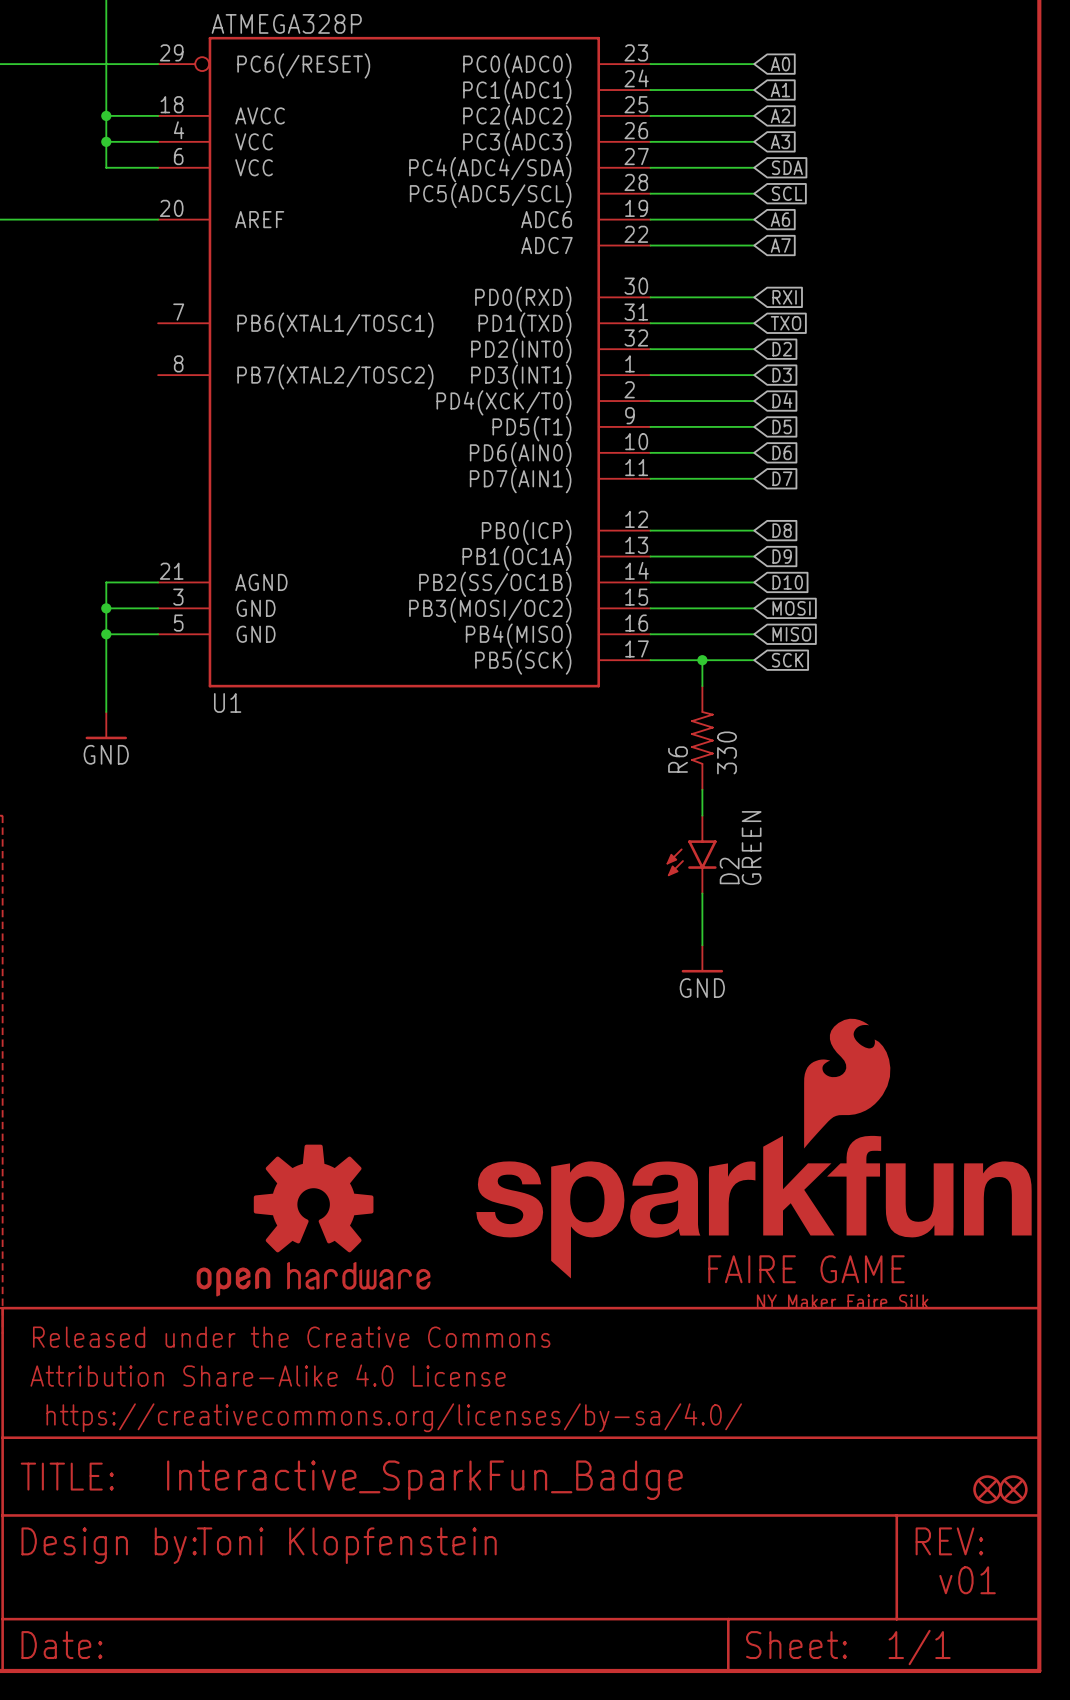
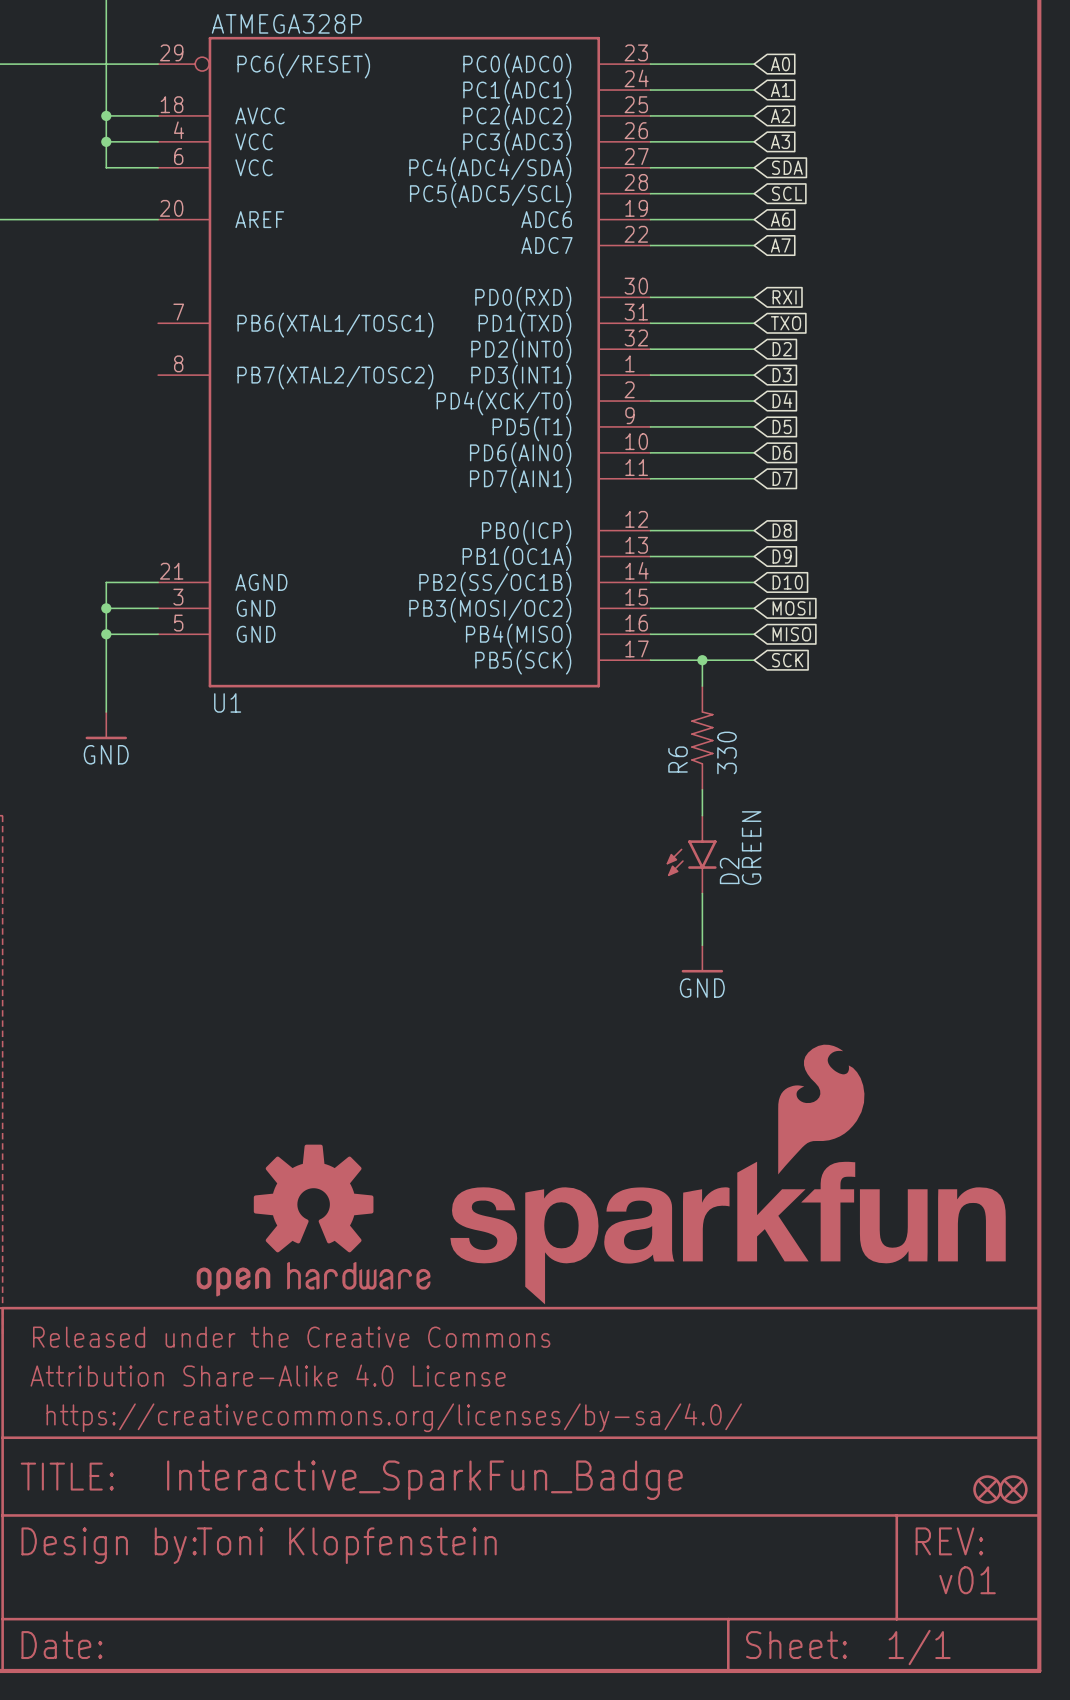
part: (753, 1148) -> none
part: none -> (728, 1174)
part: (842, 1301) -> none

